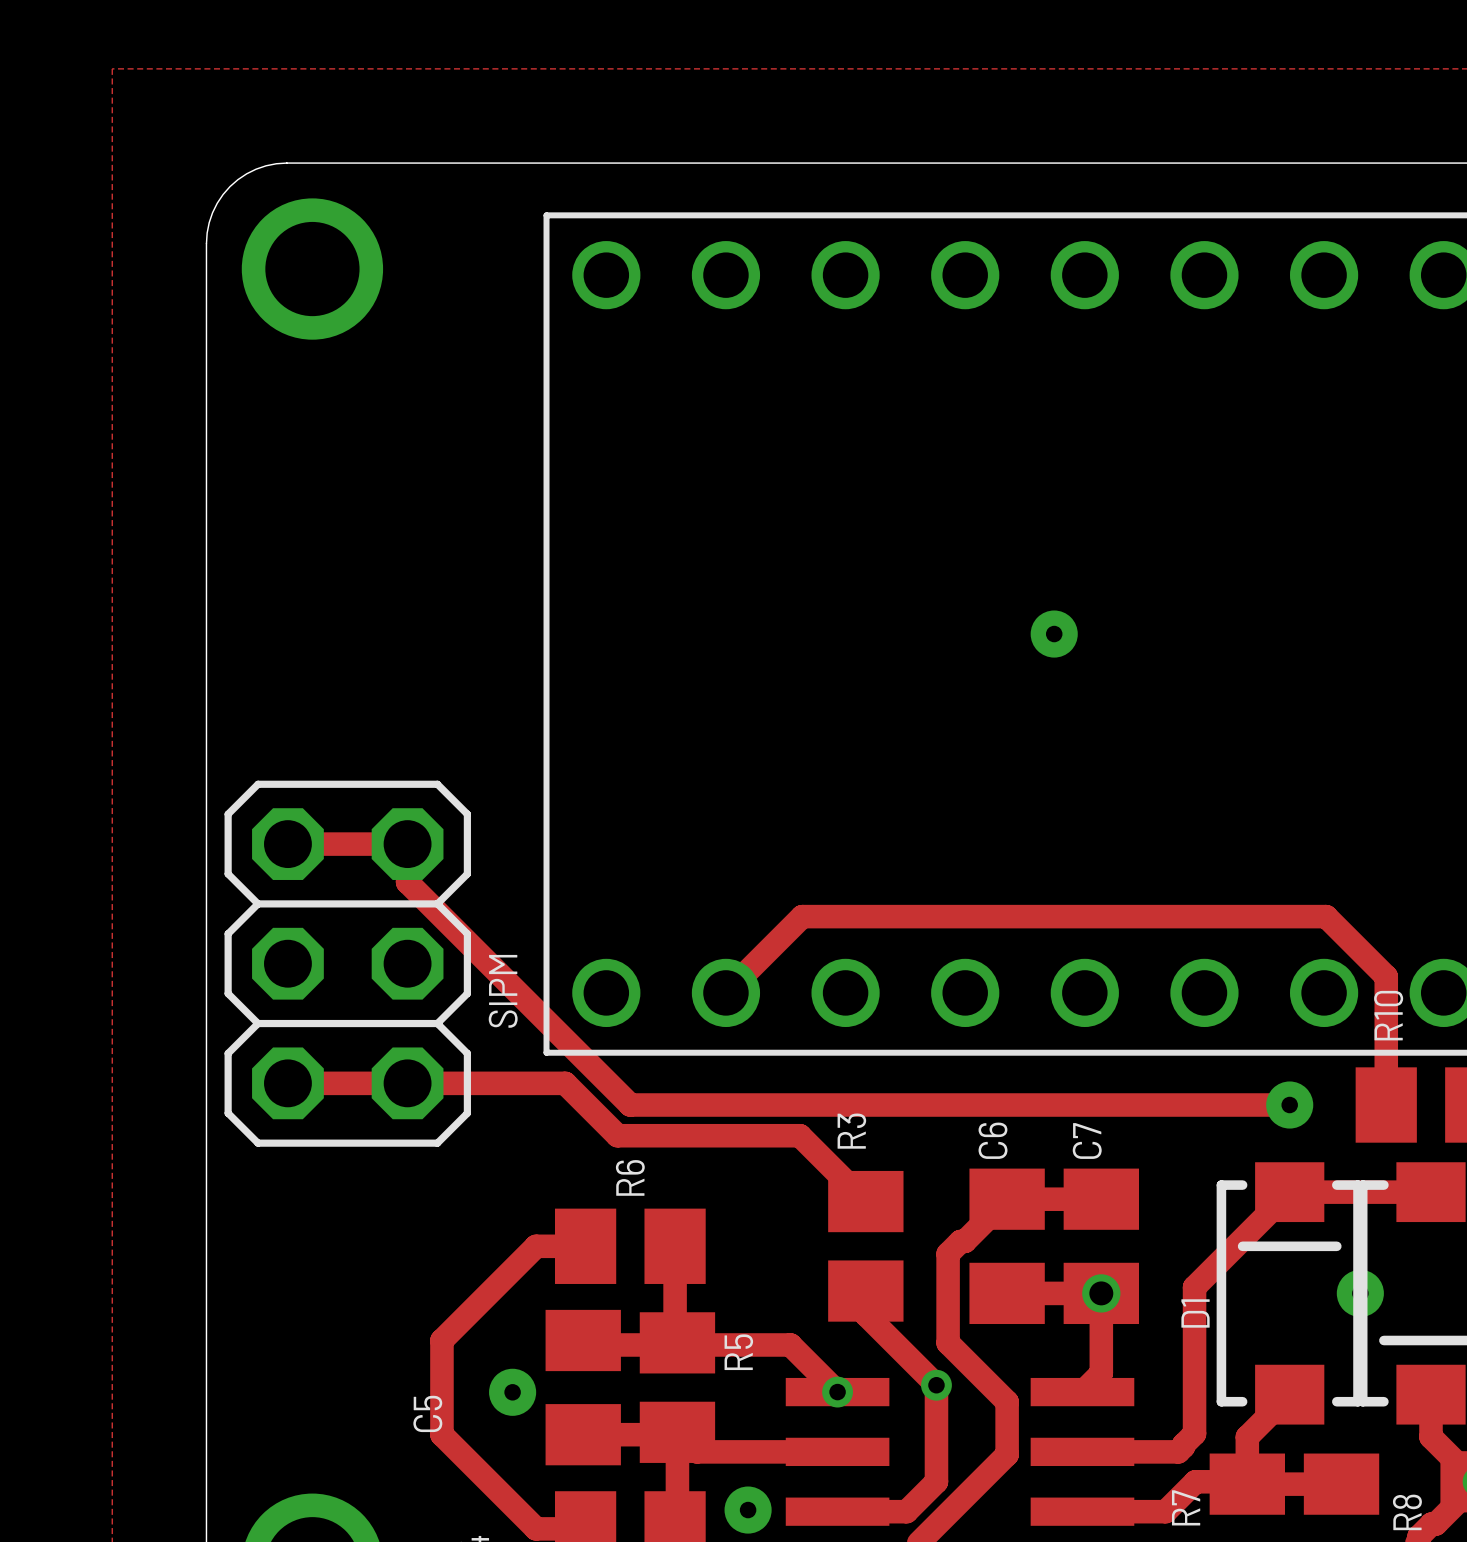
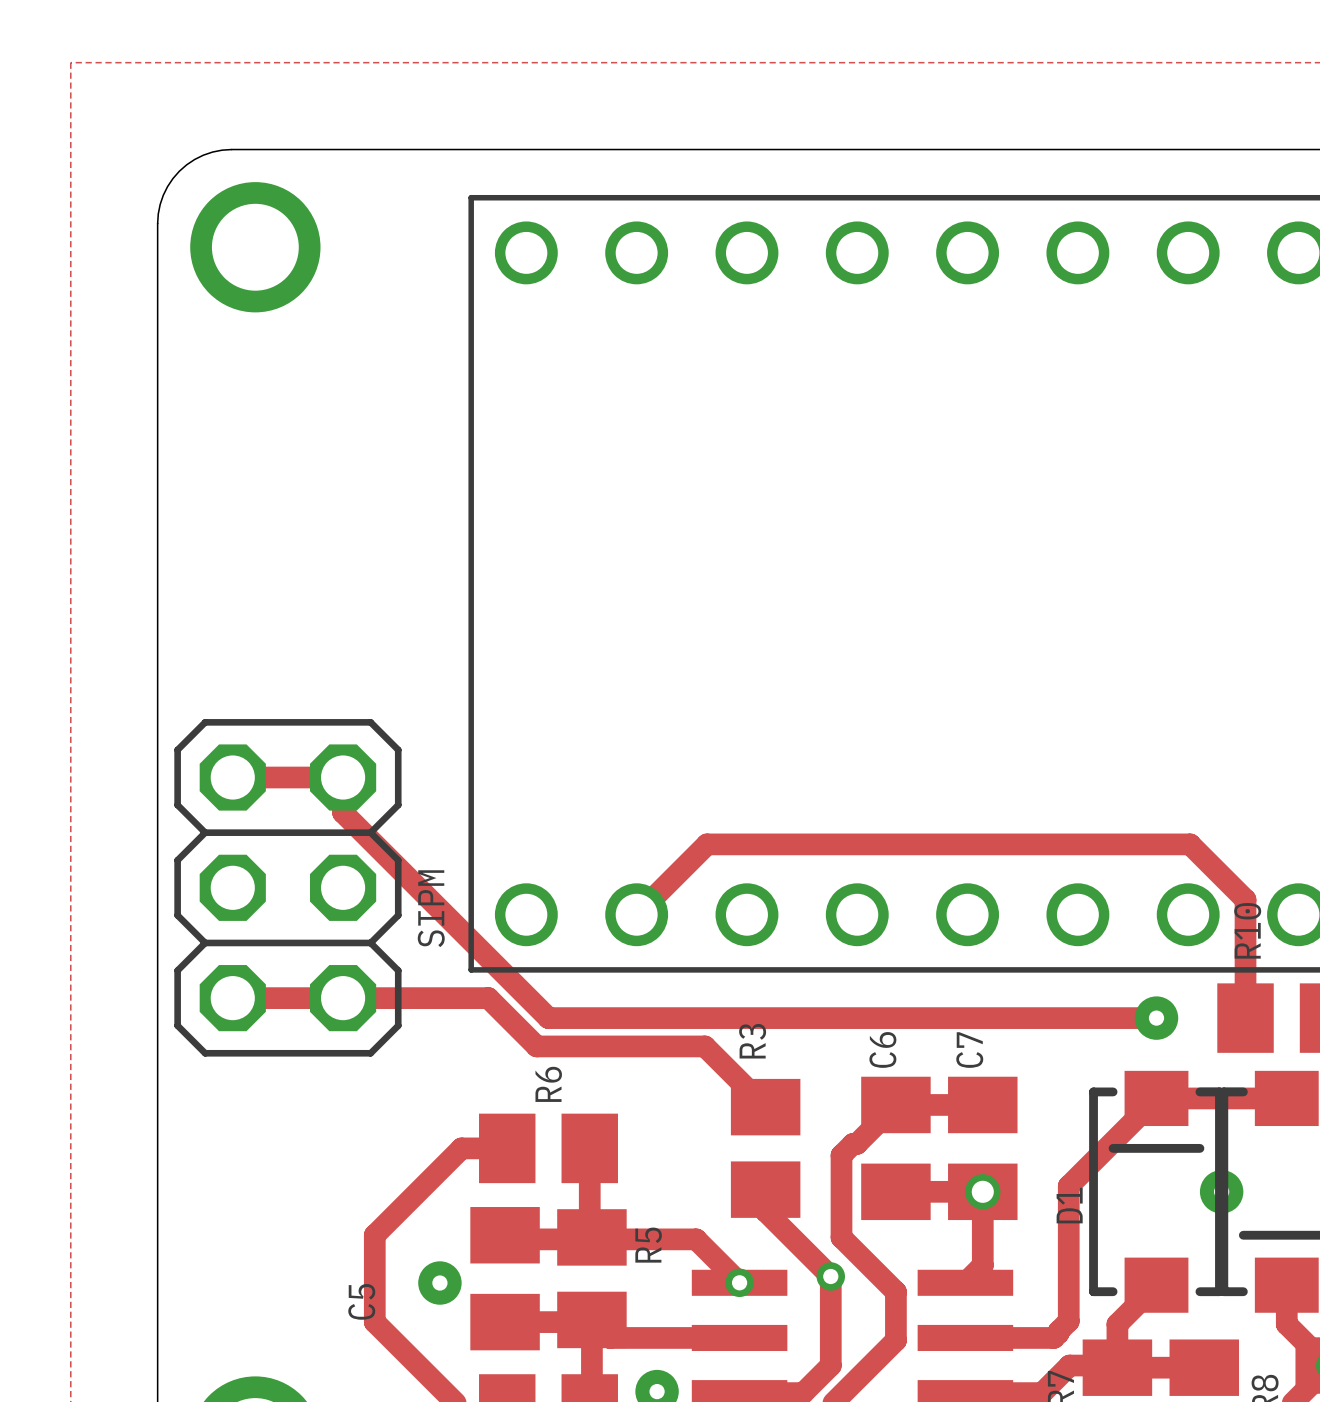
via: (1054, 634) -> none

